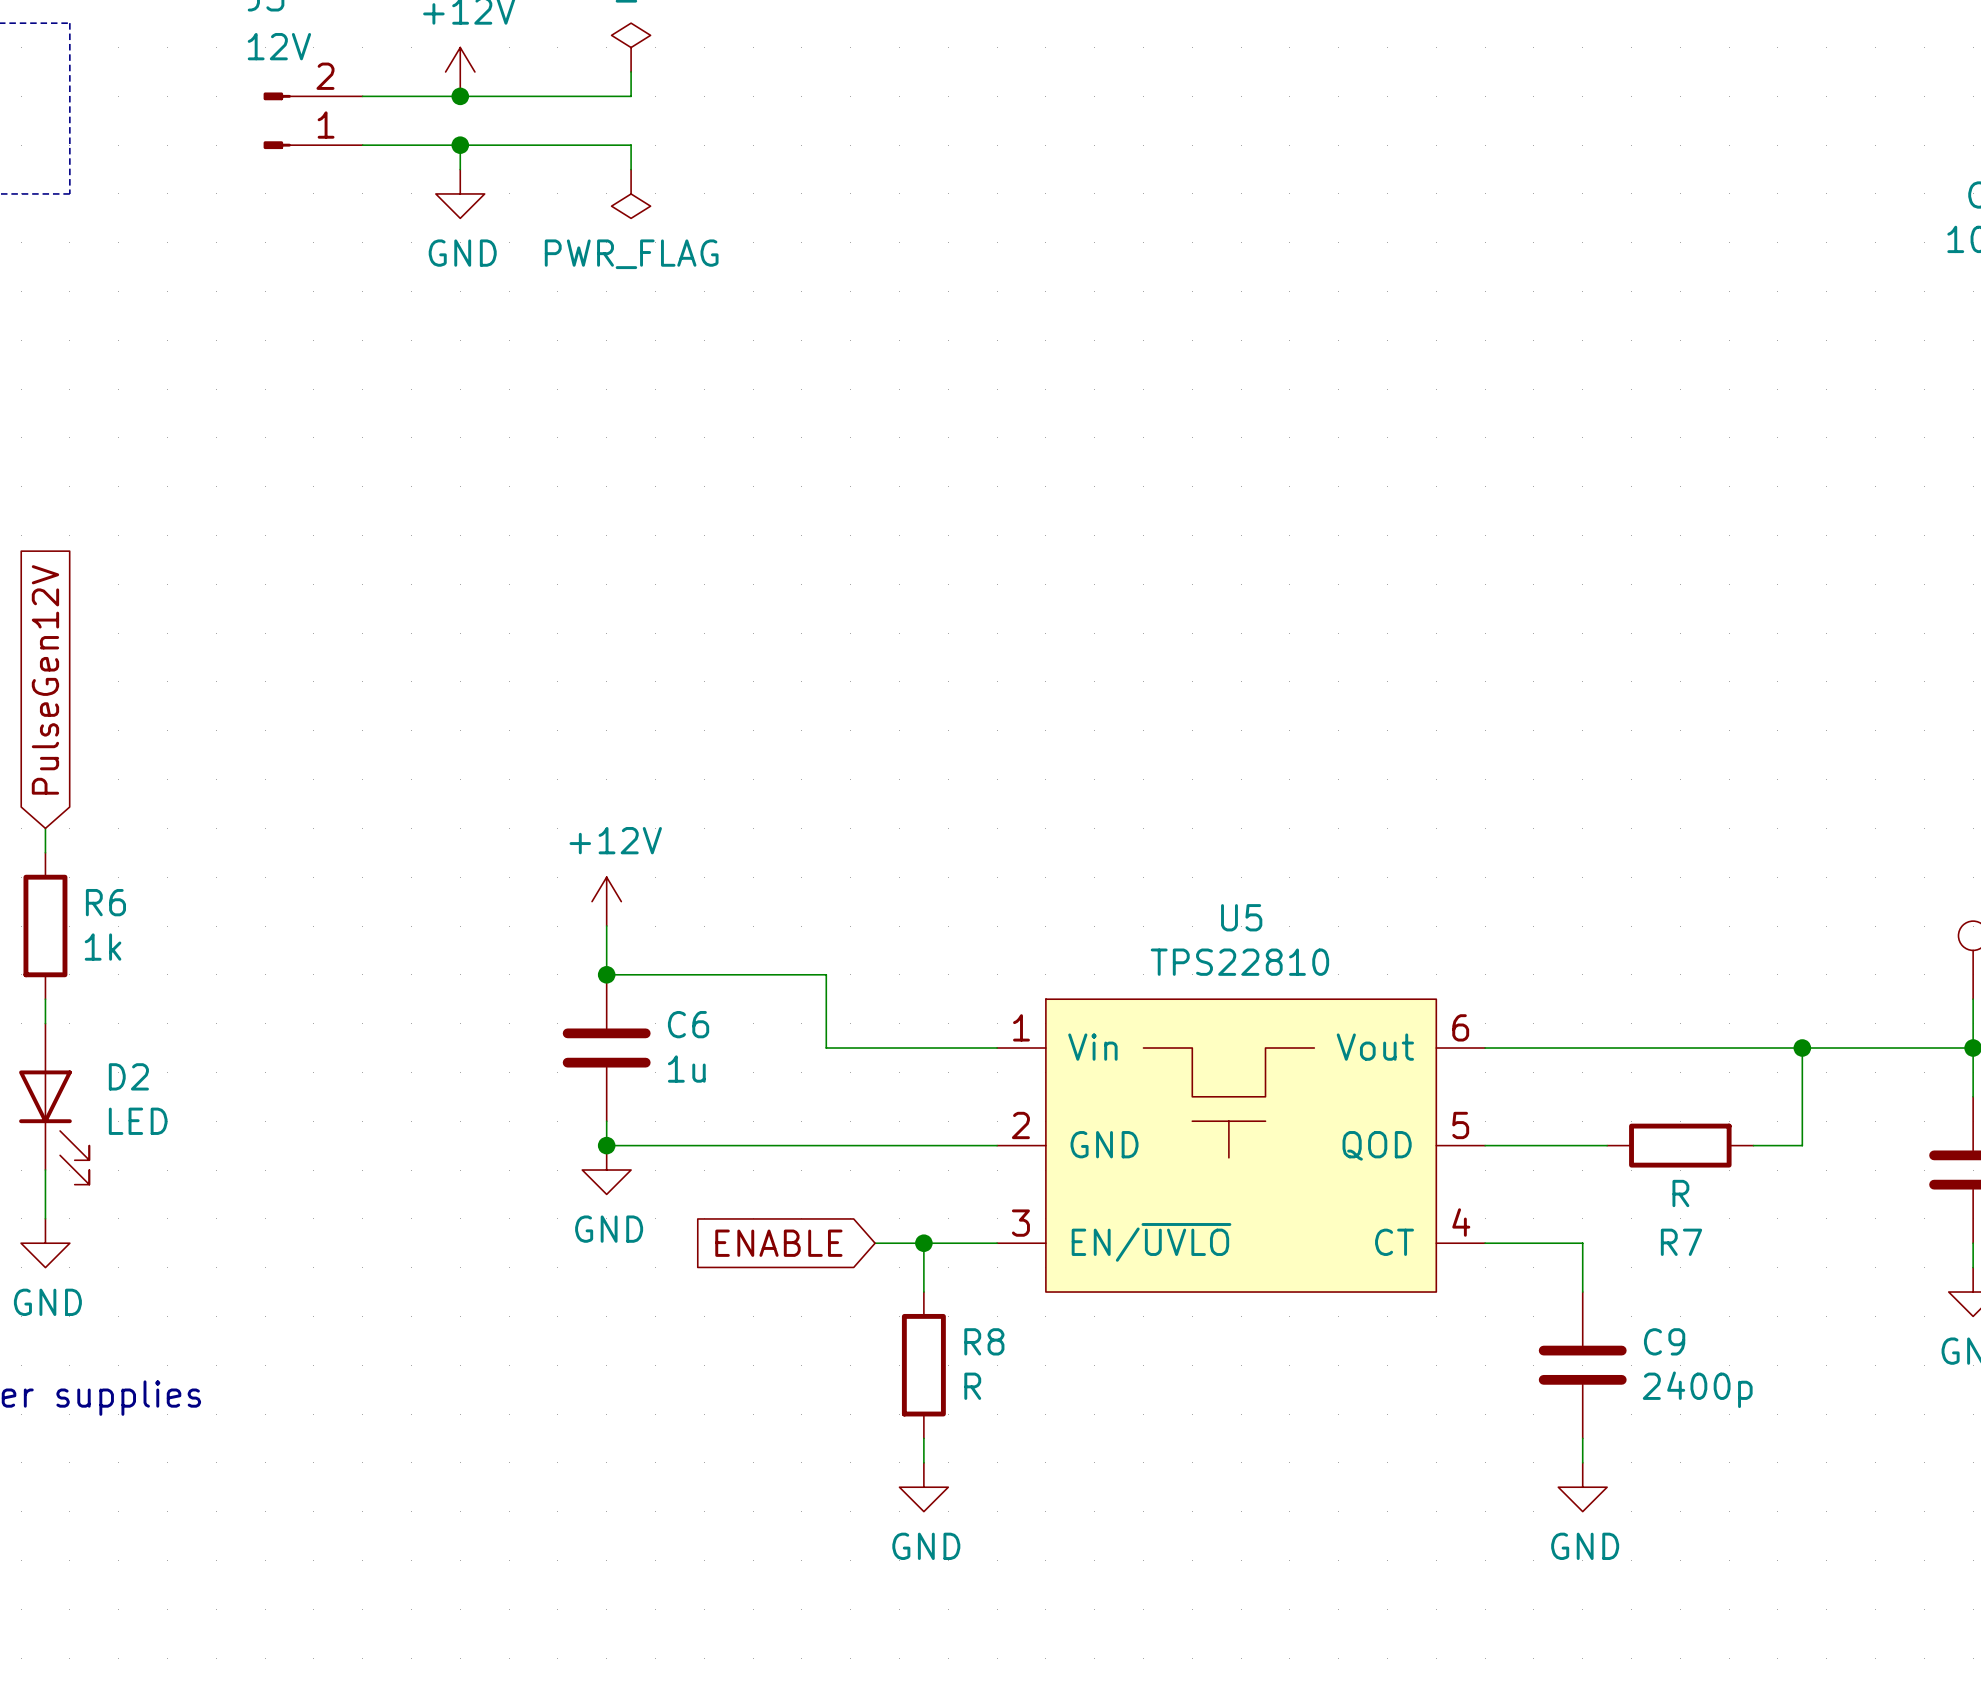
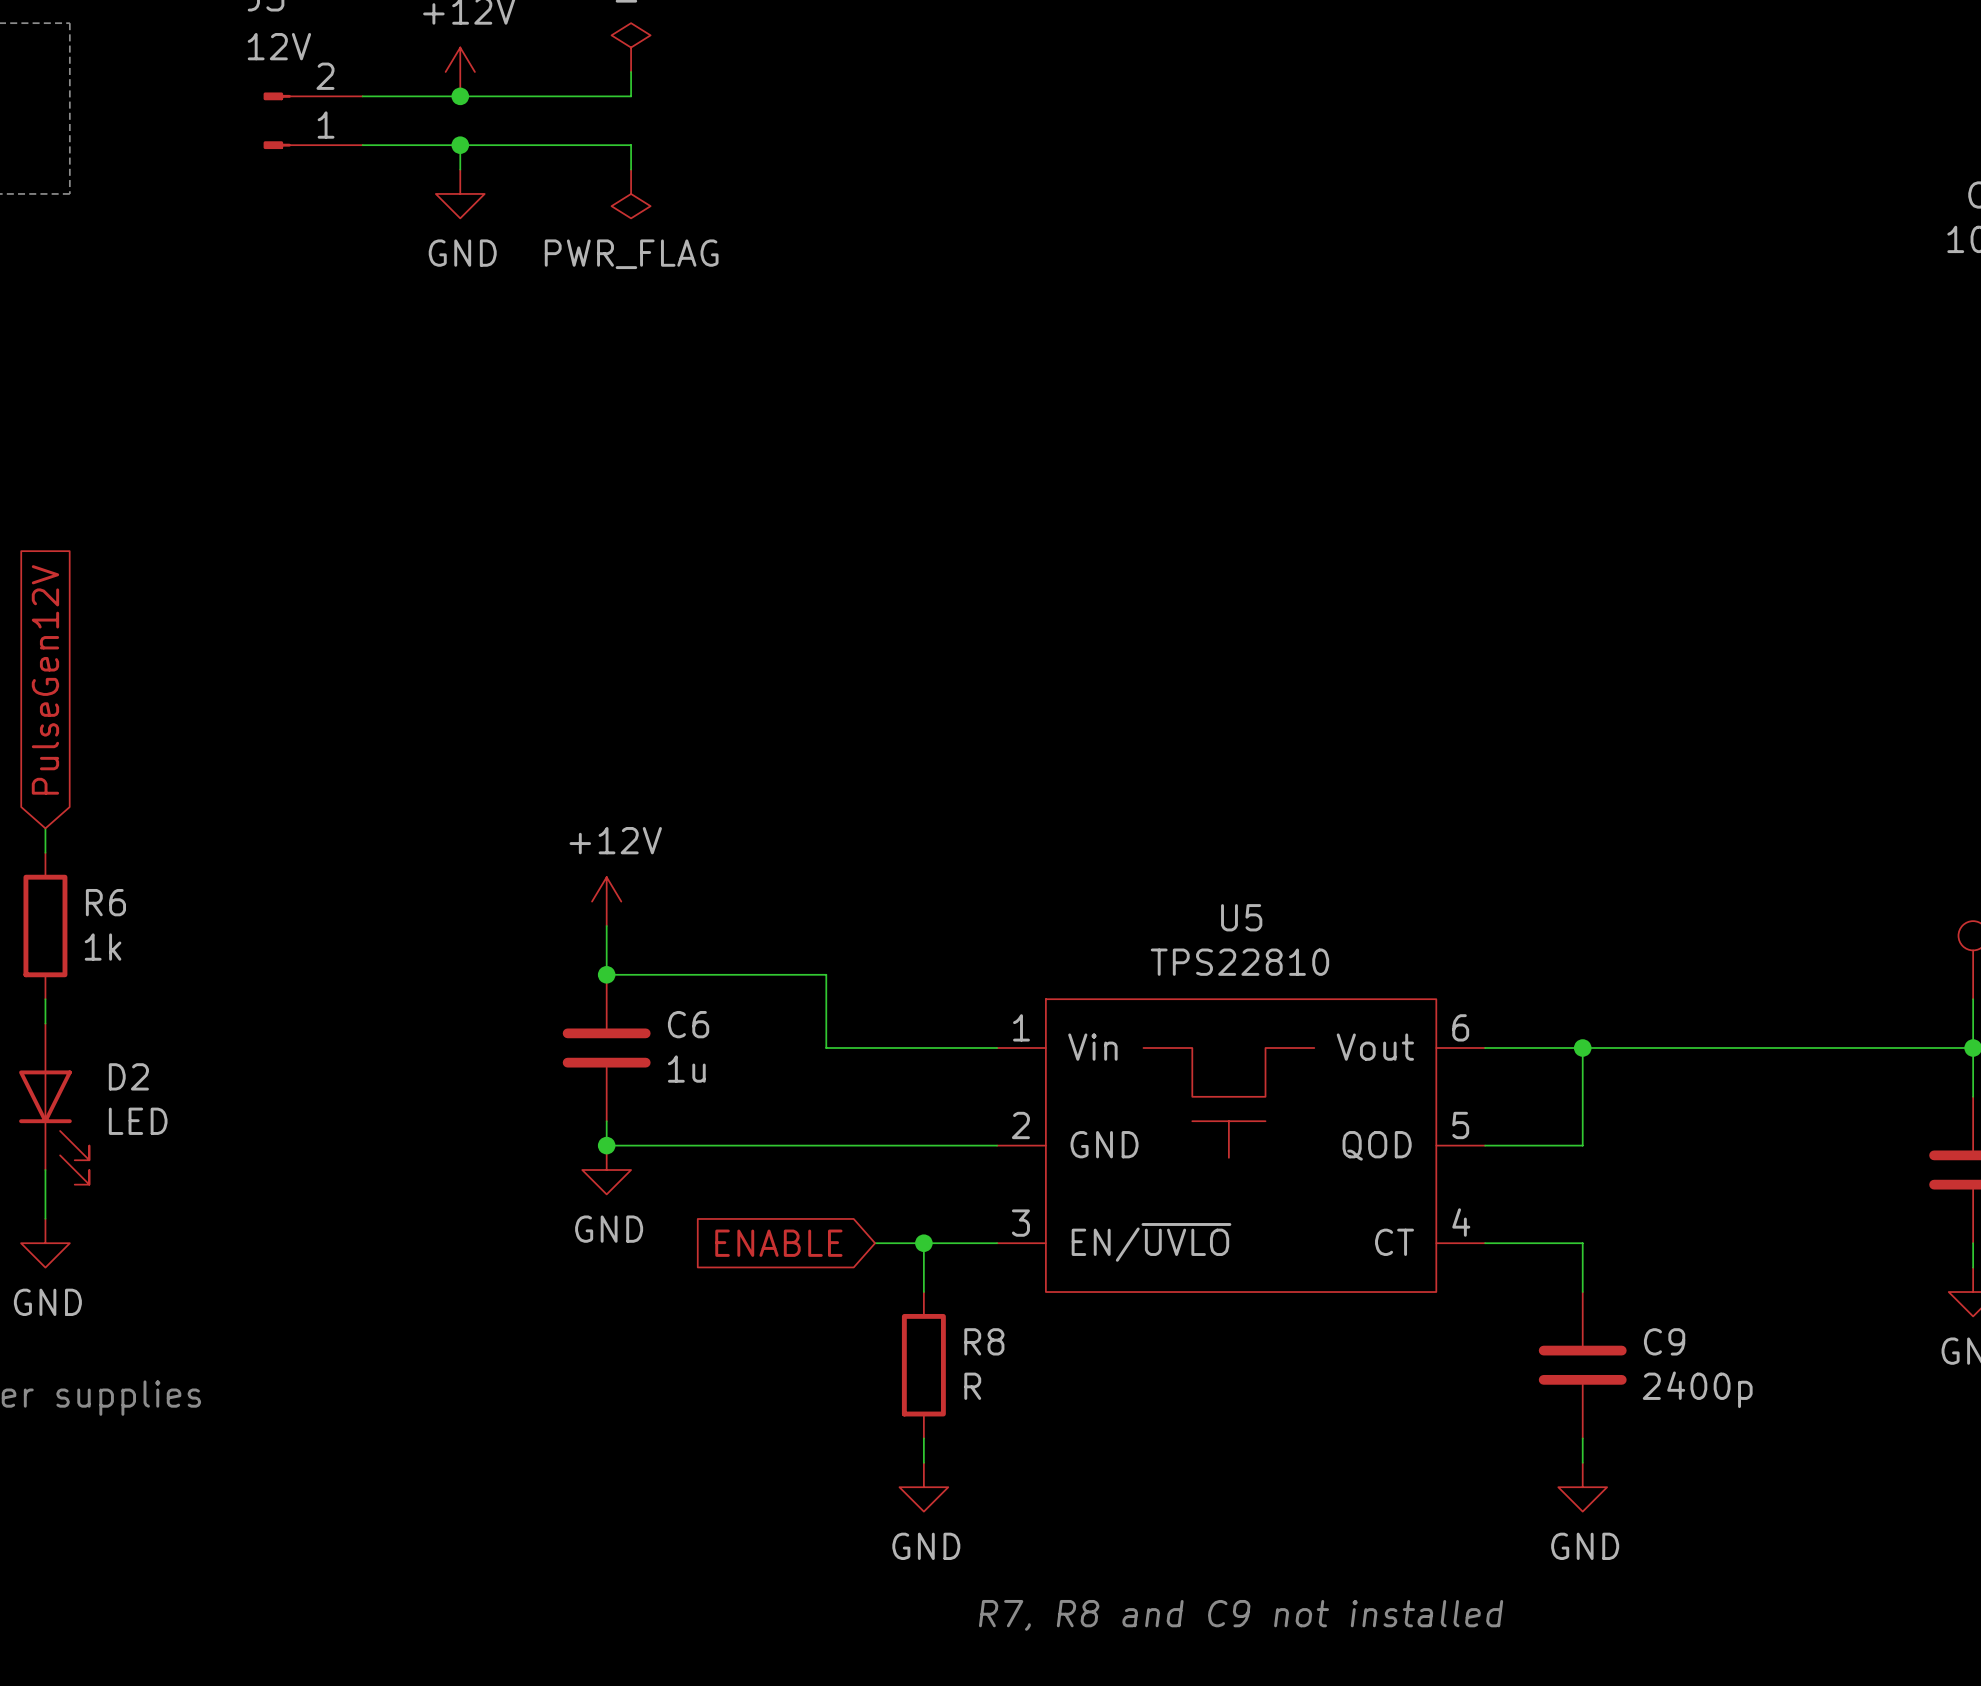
junction: none -> (1582, 1048)
wire: (1802, 1048) (1802, 1145) (1753, 1145) -> none
junction: (1802, 1048) -> none
wire: (1582, 1145) (1607, 1145) -> (1582, 1145) (1582, 1048)
R7: R (1680, 1145) -> none
text: none -> R7, R8 and C9 not installed (1241, 1615)

